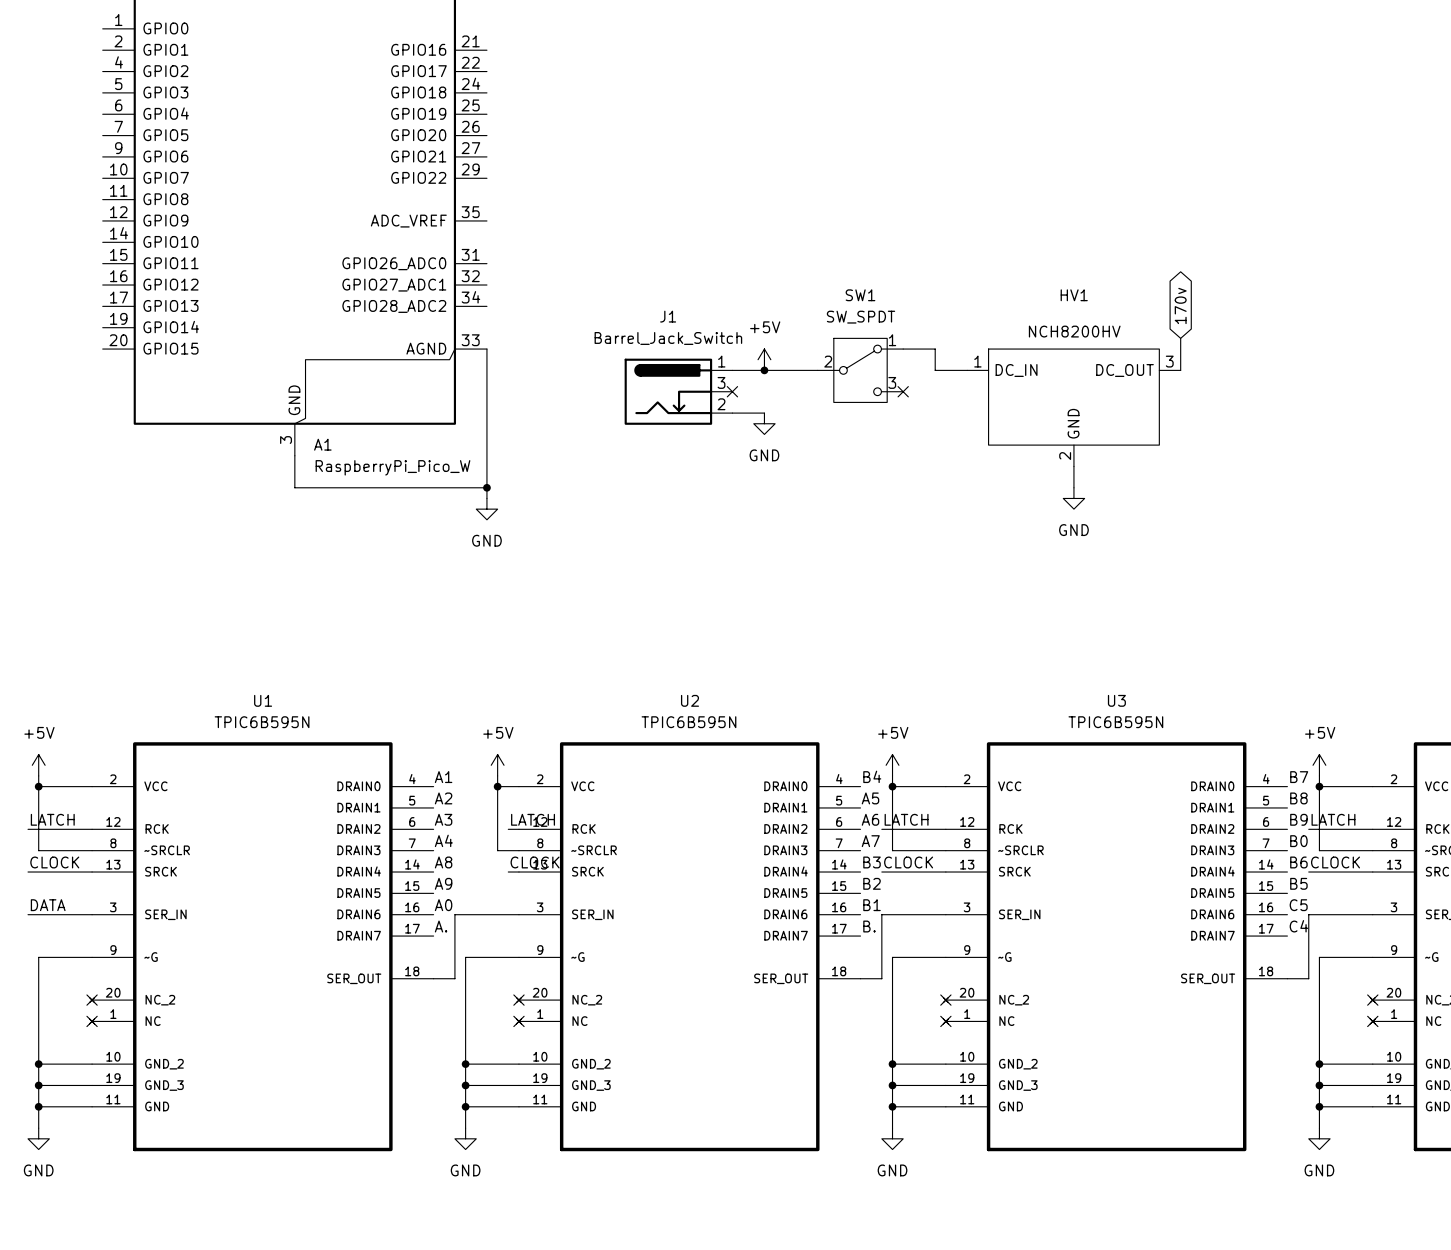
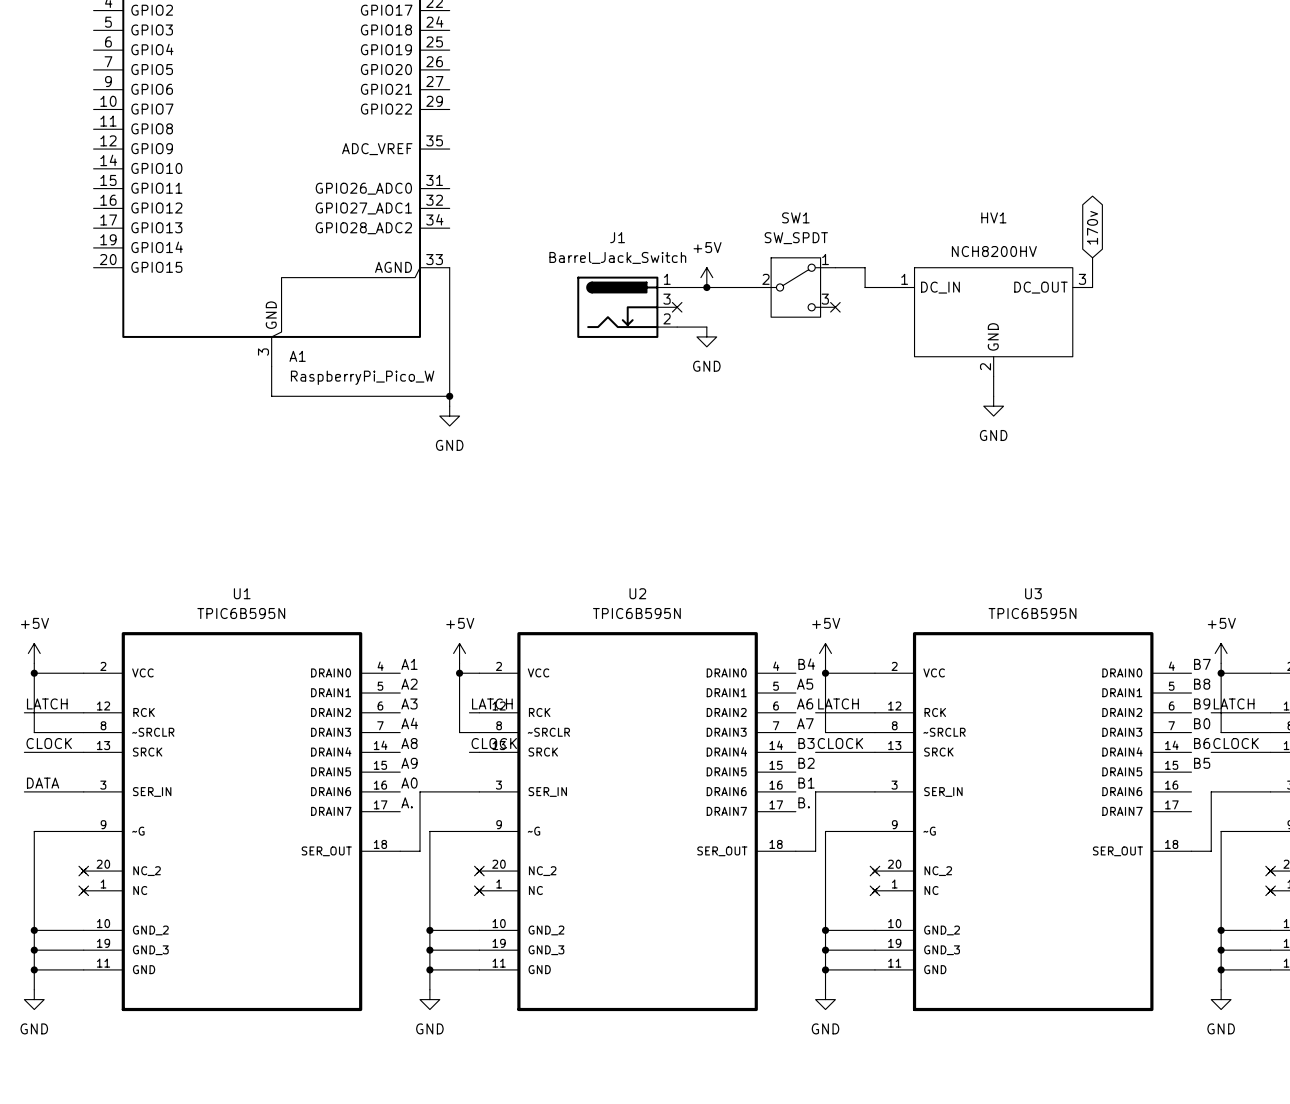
label: C5 (1298, 905) -> none
label: C4 (1298, 926) -> none

